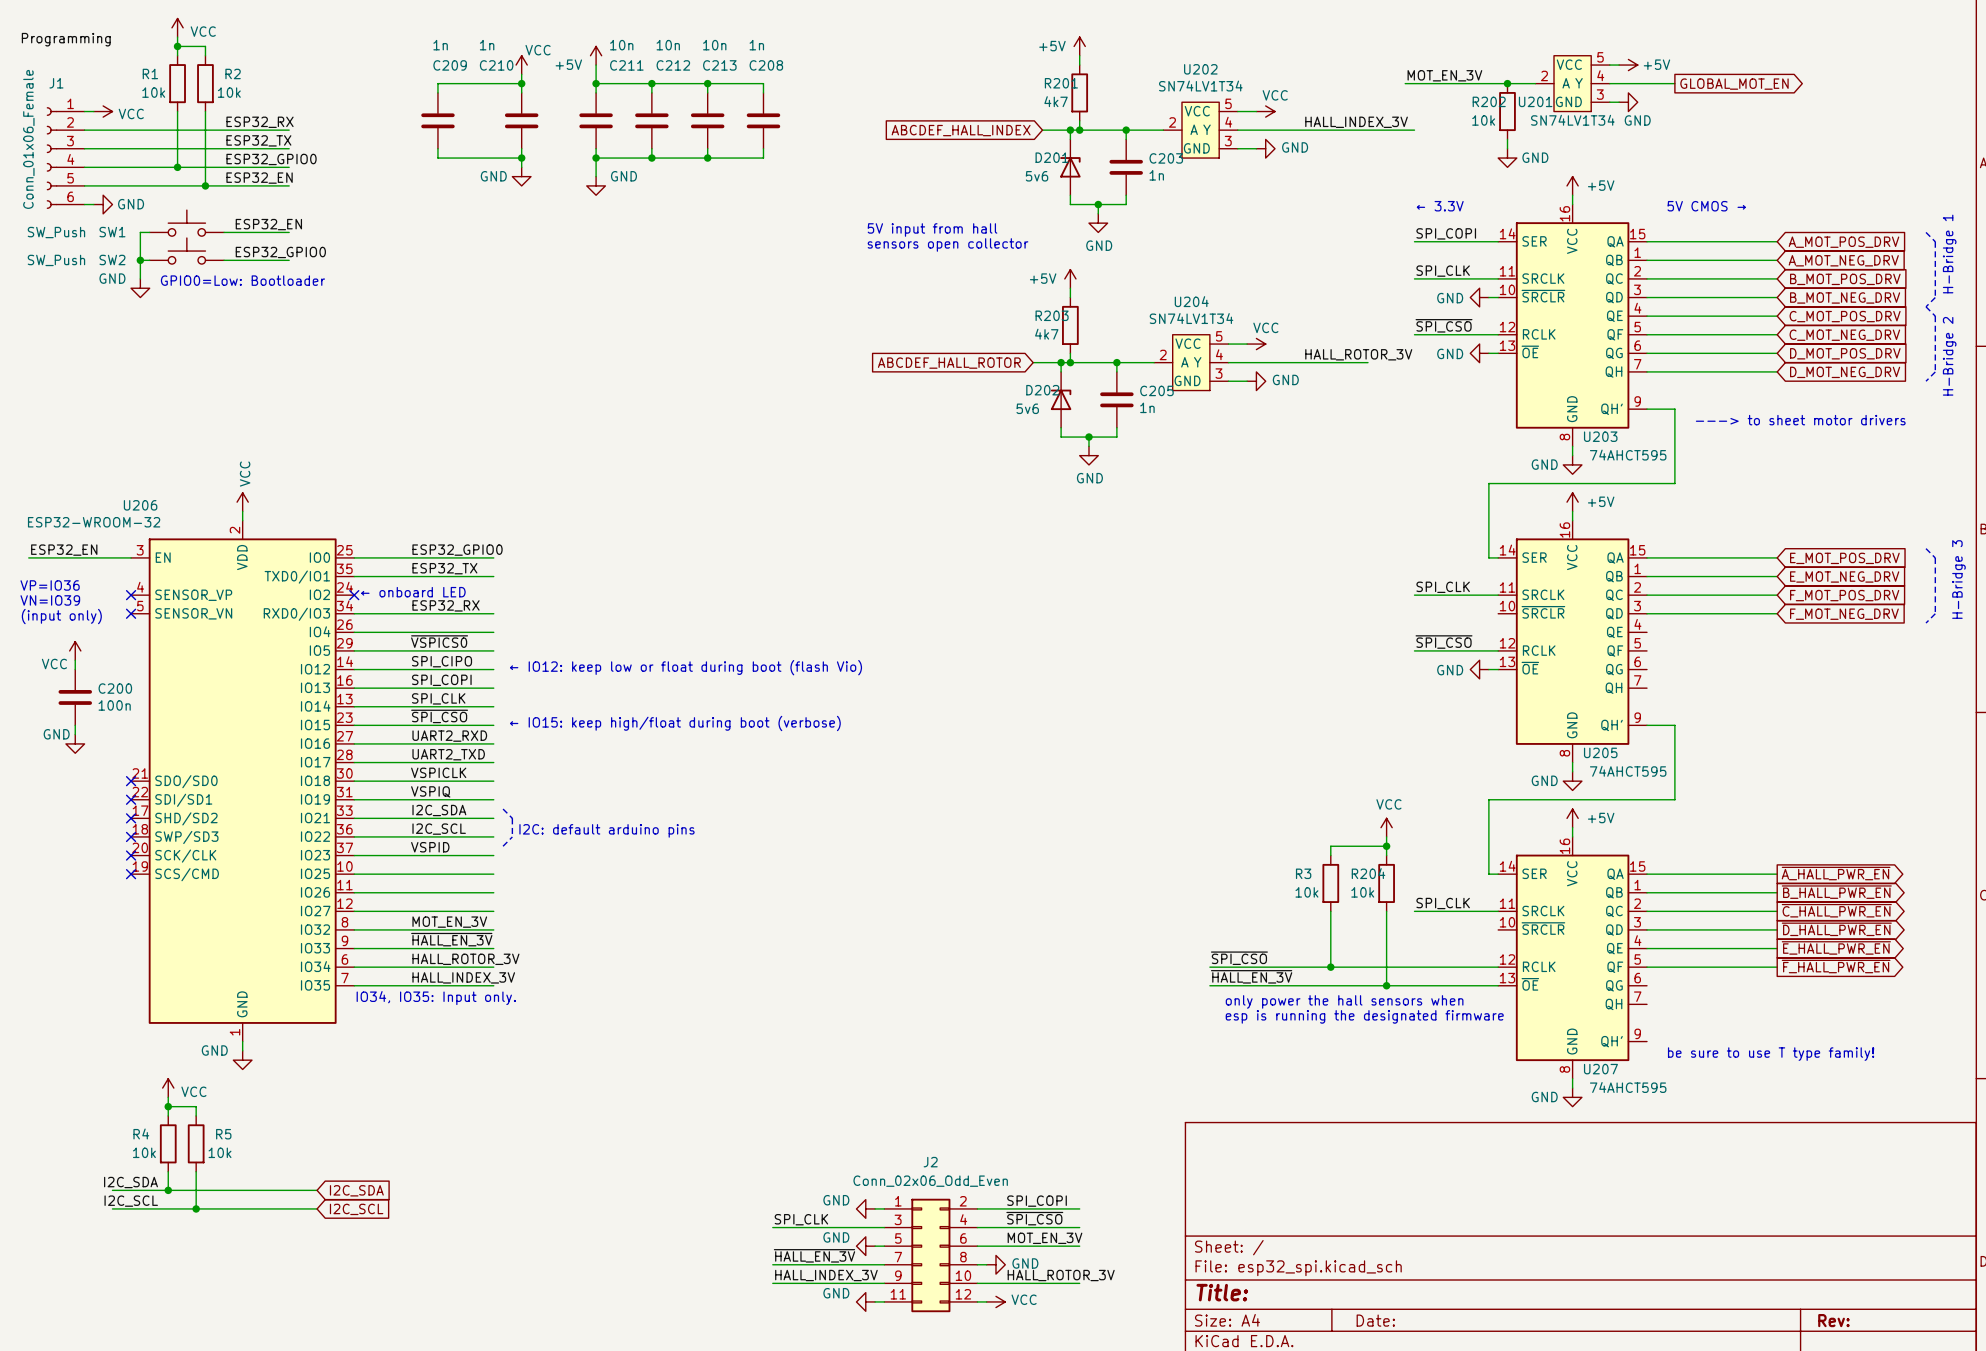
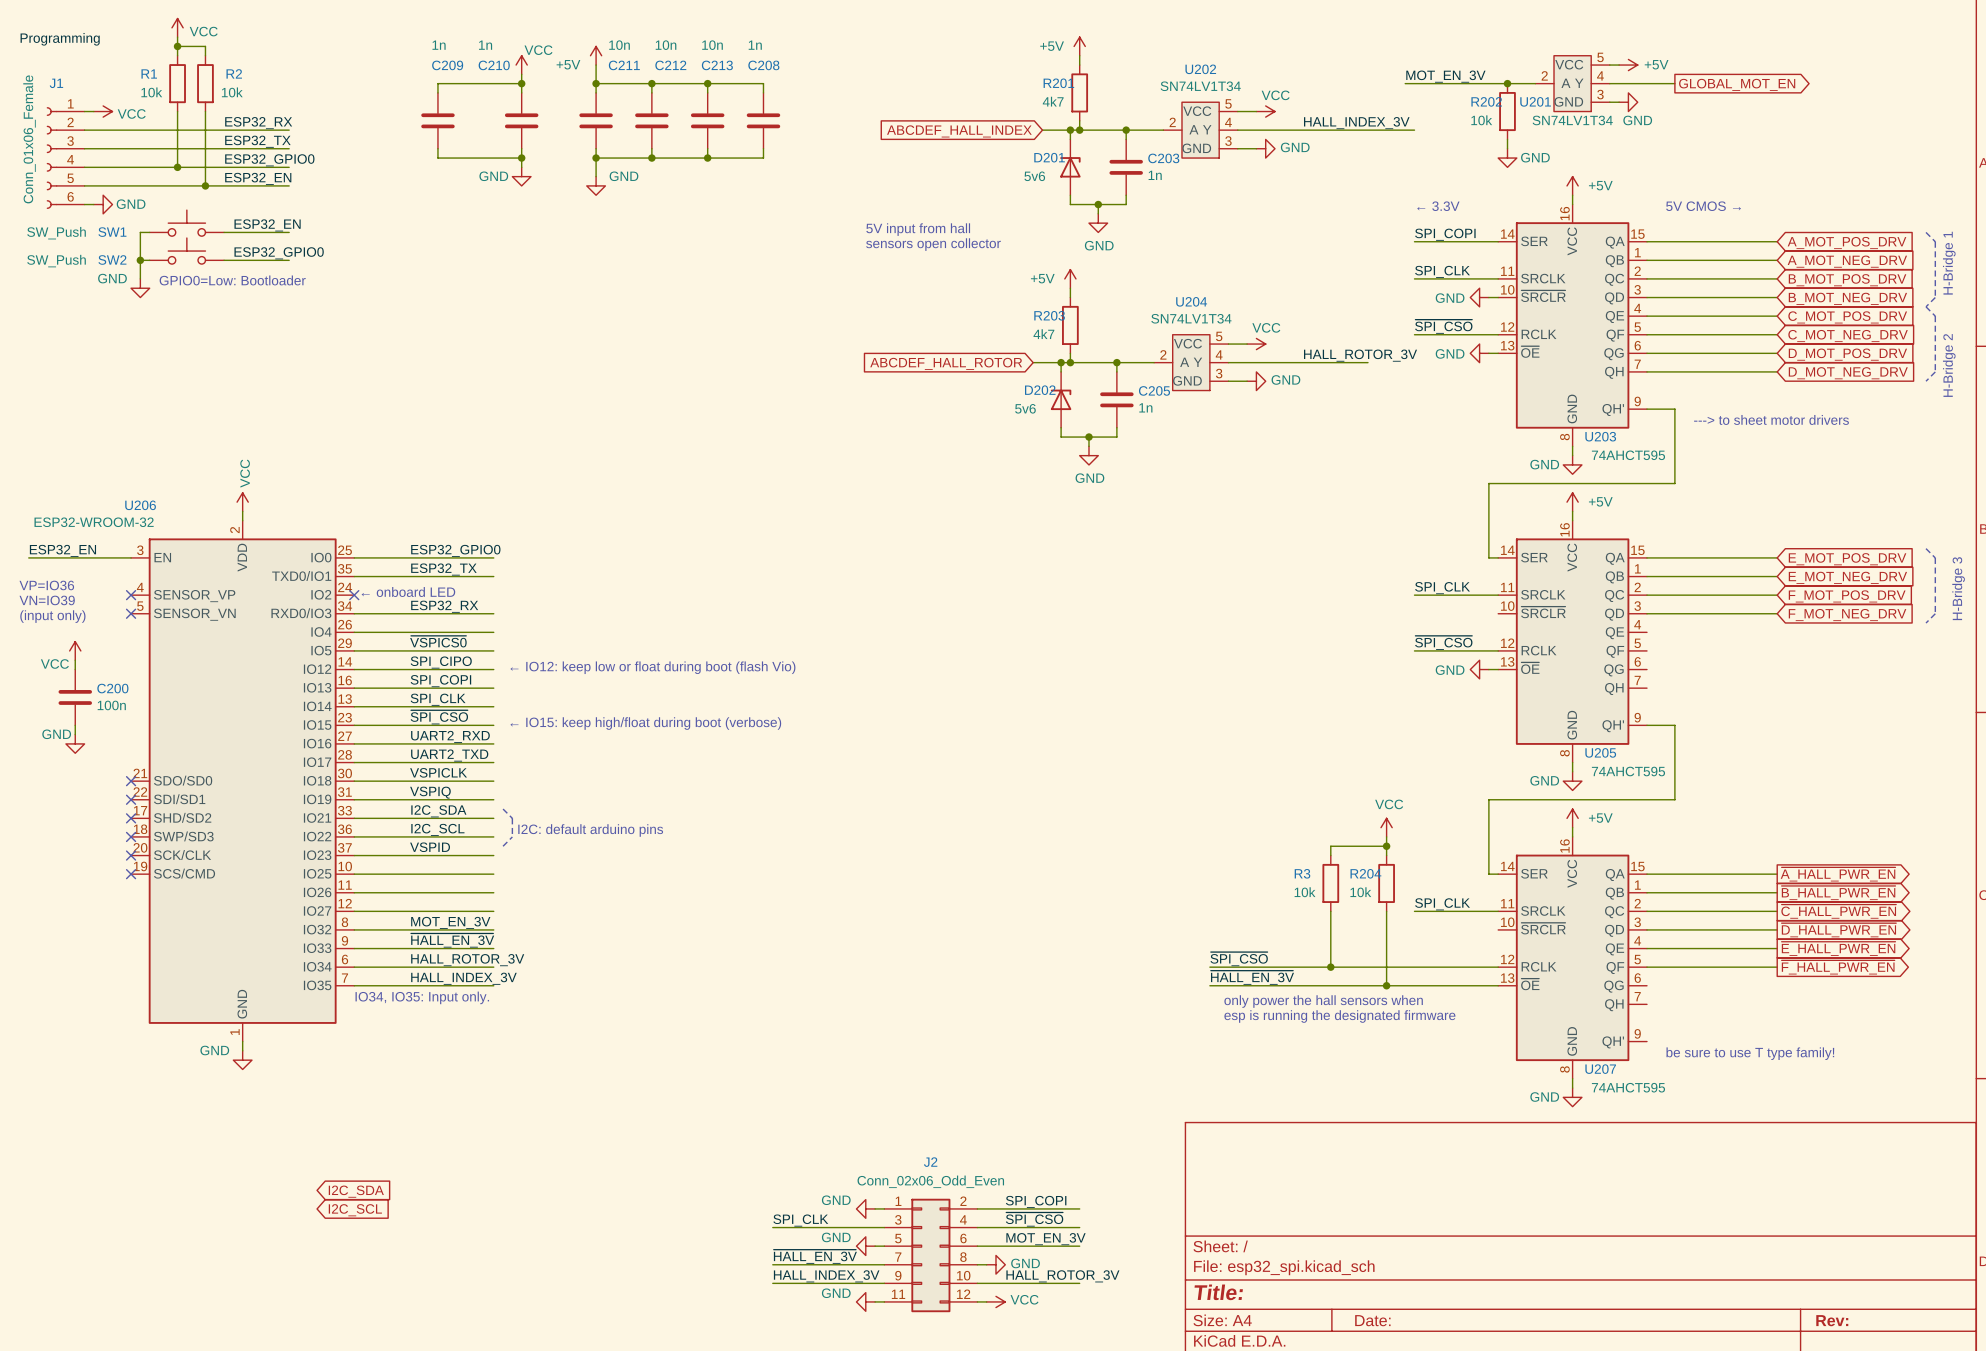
power symbol: VCC (168, 1088) -> none
wire: (168, 1097) (168, 1115) -> none
wire: (168, 1106) (196, 1106) (196, 1115) -> none
junction: (168, 1106) -> none
R4: 10k (168, 1143) -> none
R5: 10k (196, 1143) -> none
wire: (168, 1171) (168, 1190) -> none
wire: (196, 1171) (196, 1208) -> none
label: I2C_SDA (130, 1182) -> none
wire: (112, 1190) (317, 1190) -> none
junction: (168, 1190) -> none
label: I2C_SCL (131, 1201) -> none
wire: (112, 1208) (317, 1208) -> none
junction: (196, 1208) -> none

